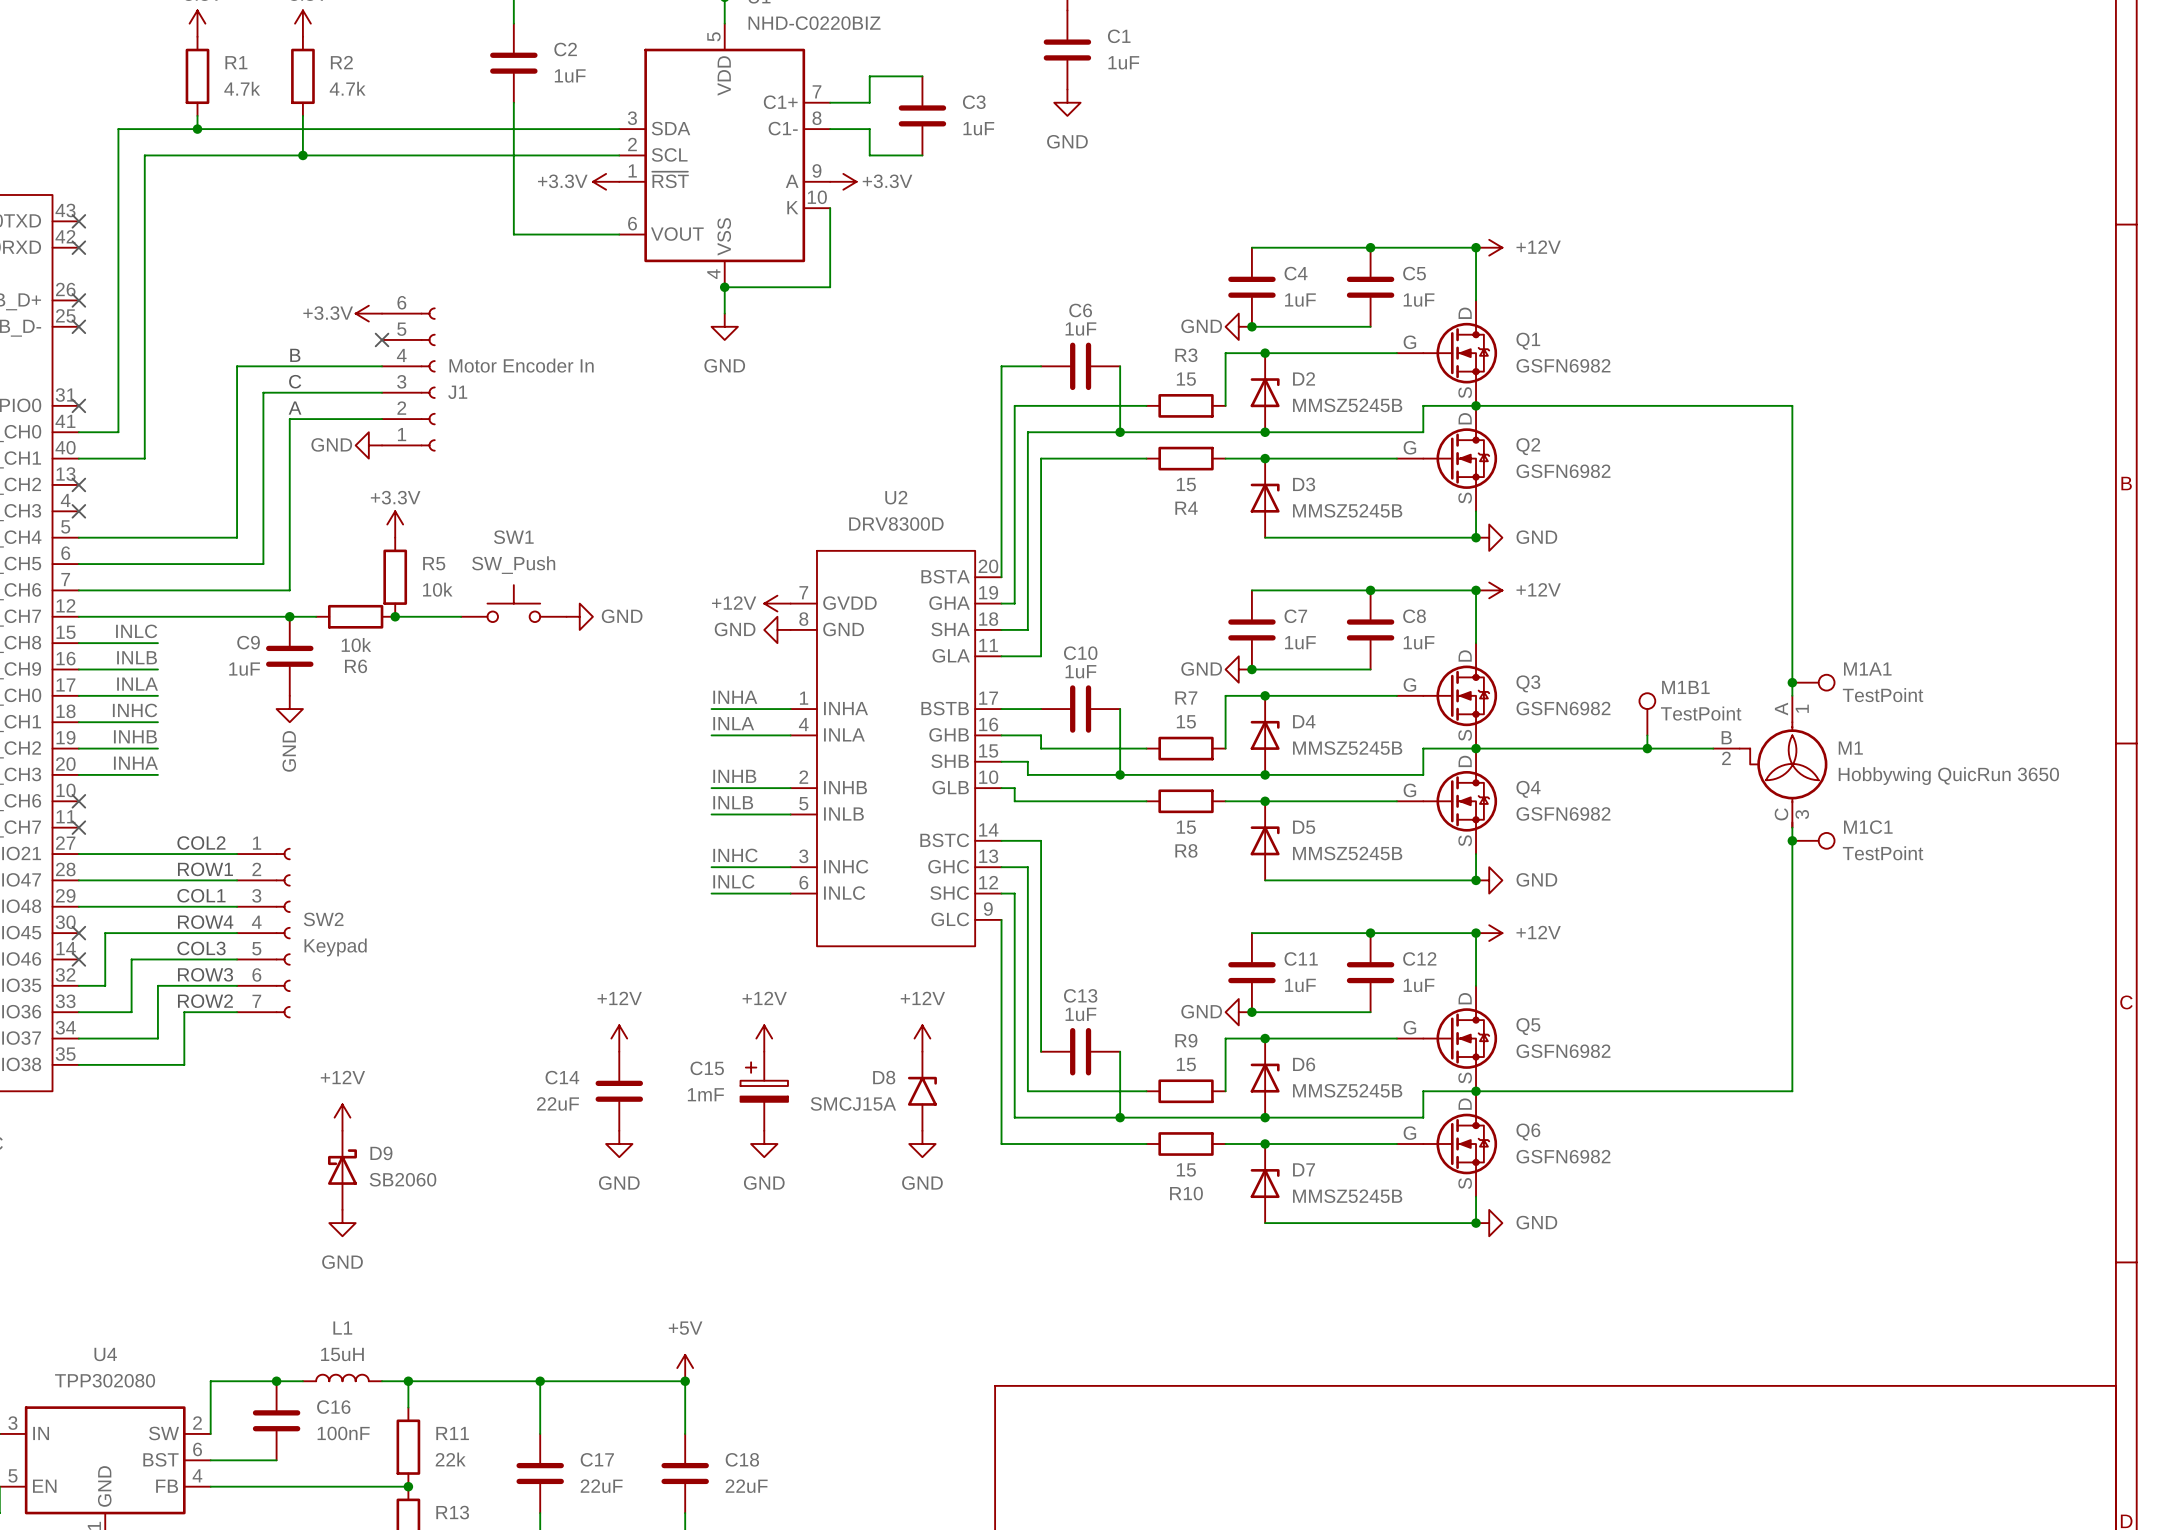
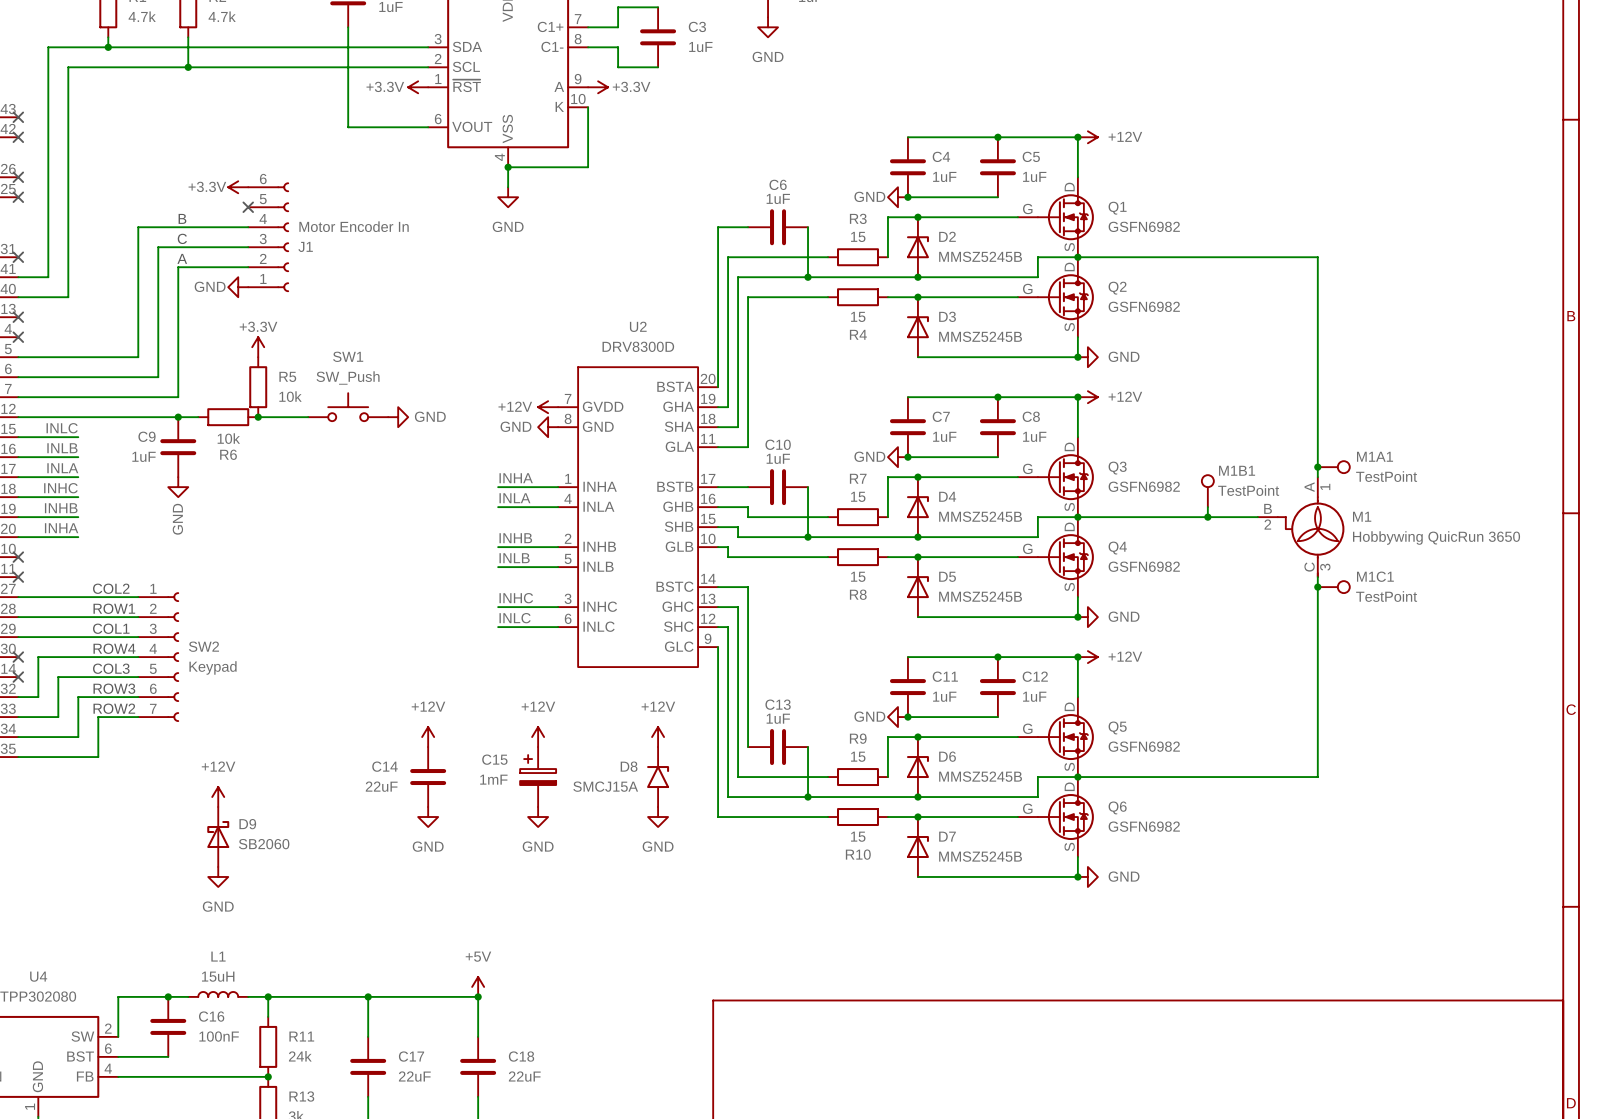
R11 value: 22k (450, 1459) -> 24k (300, 1056)

